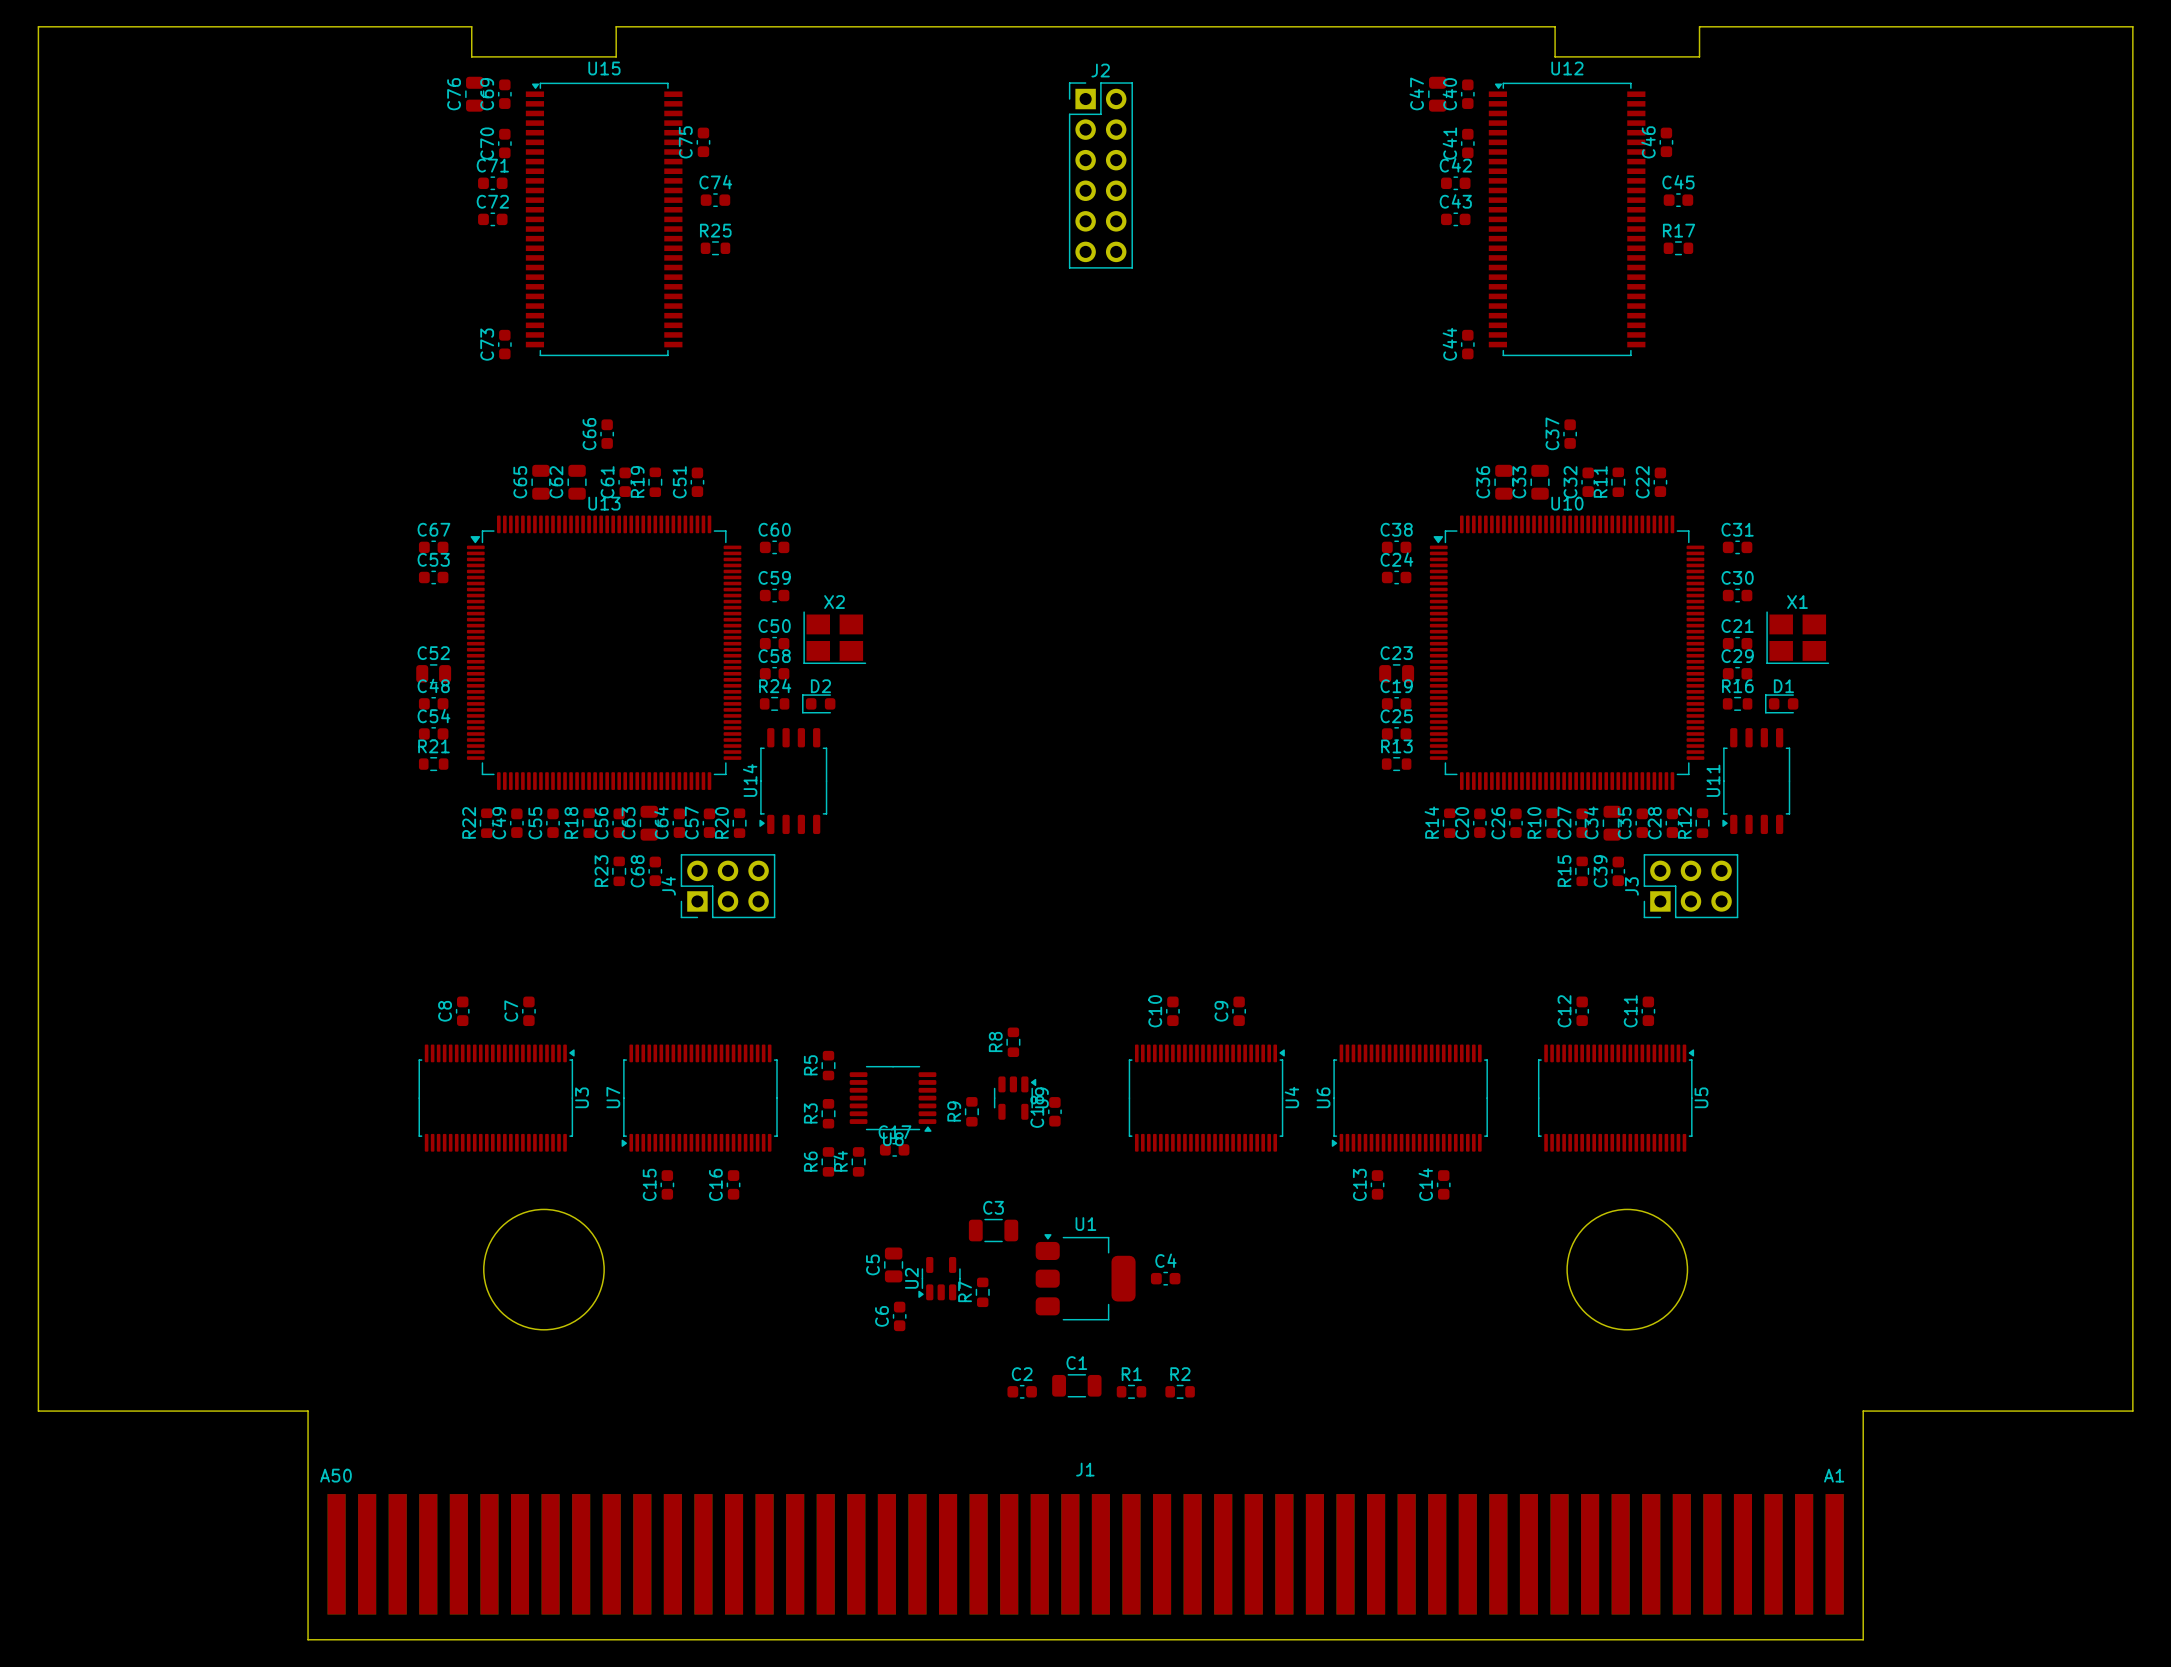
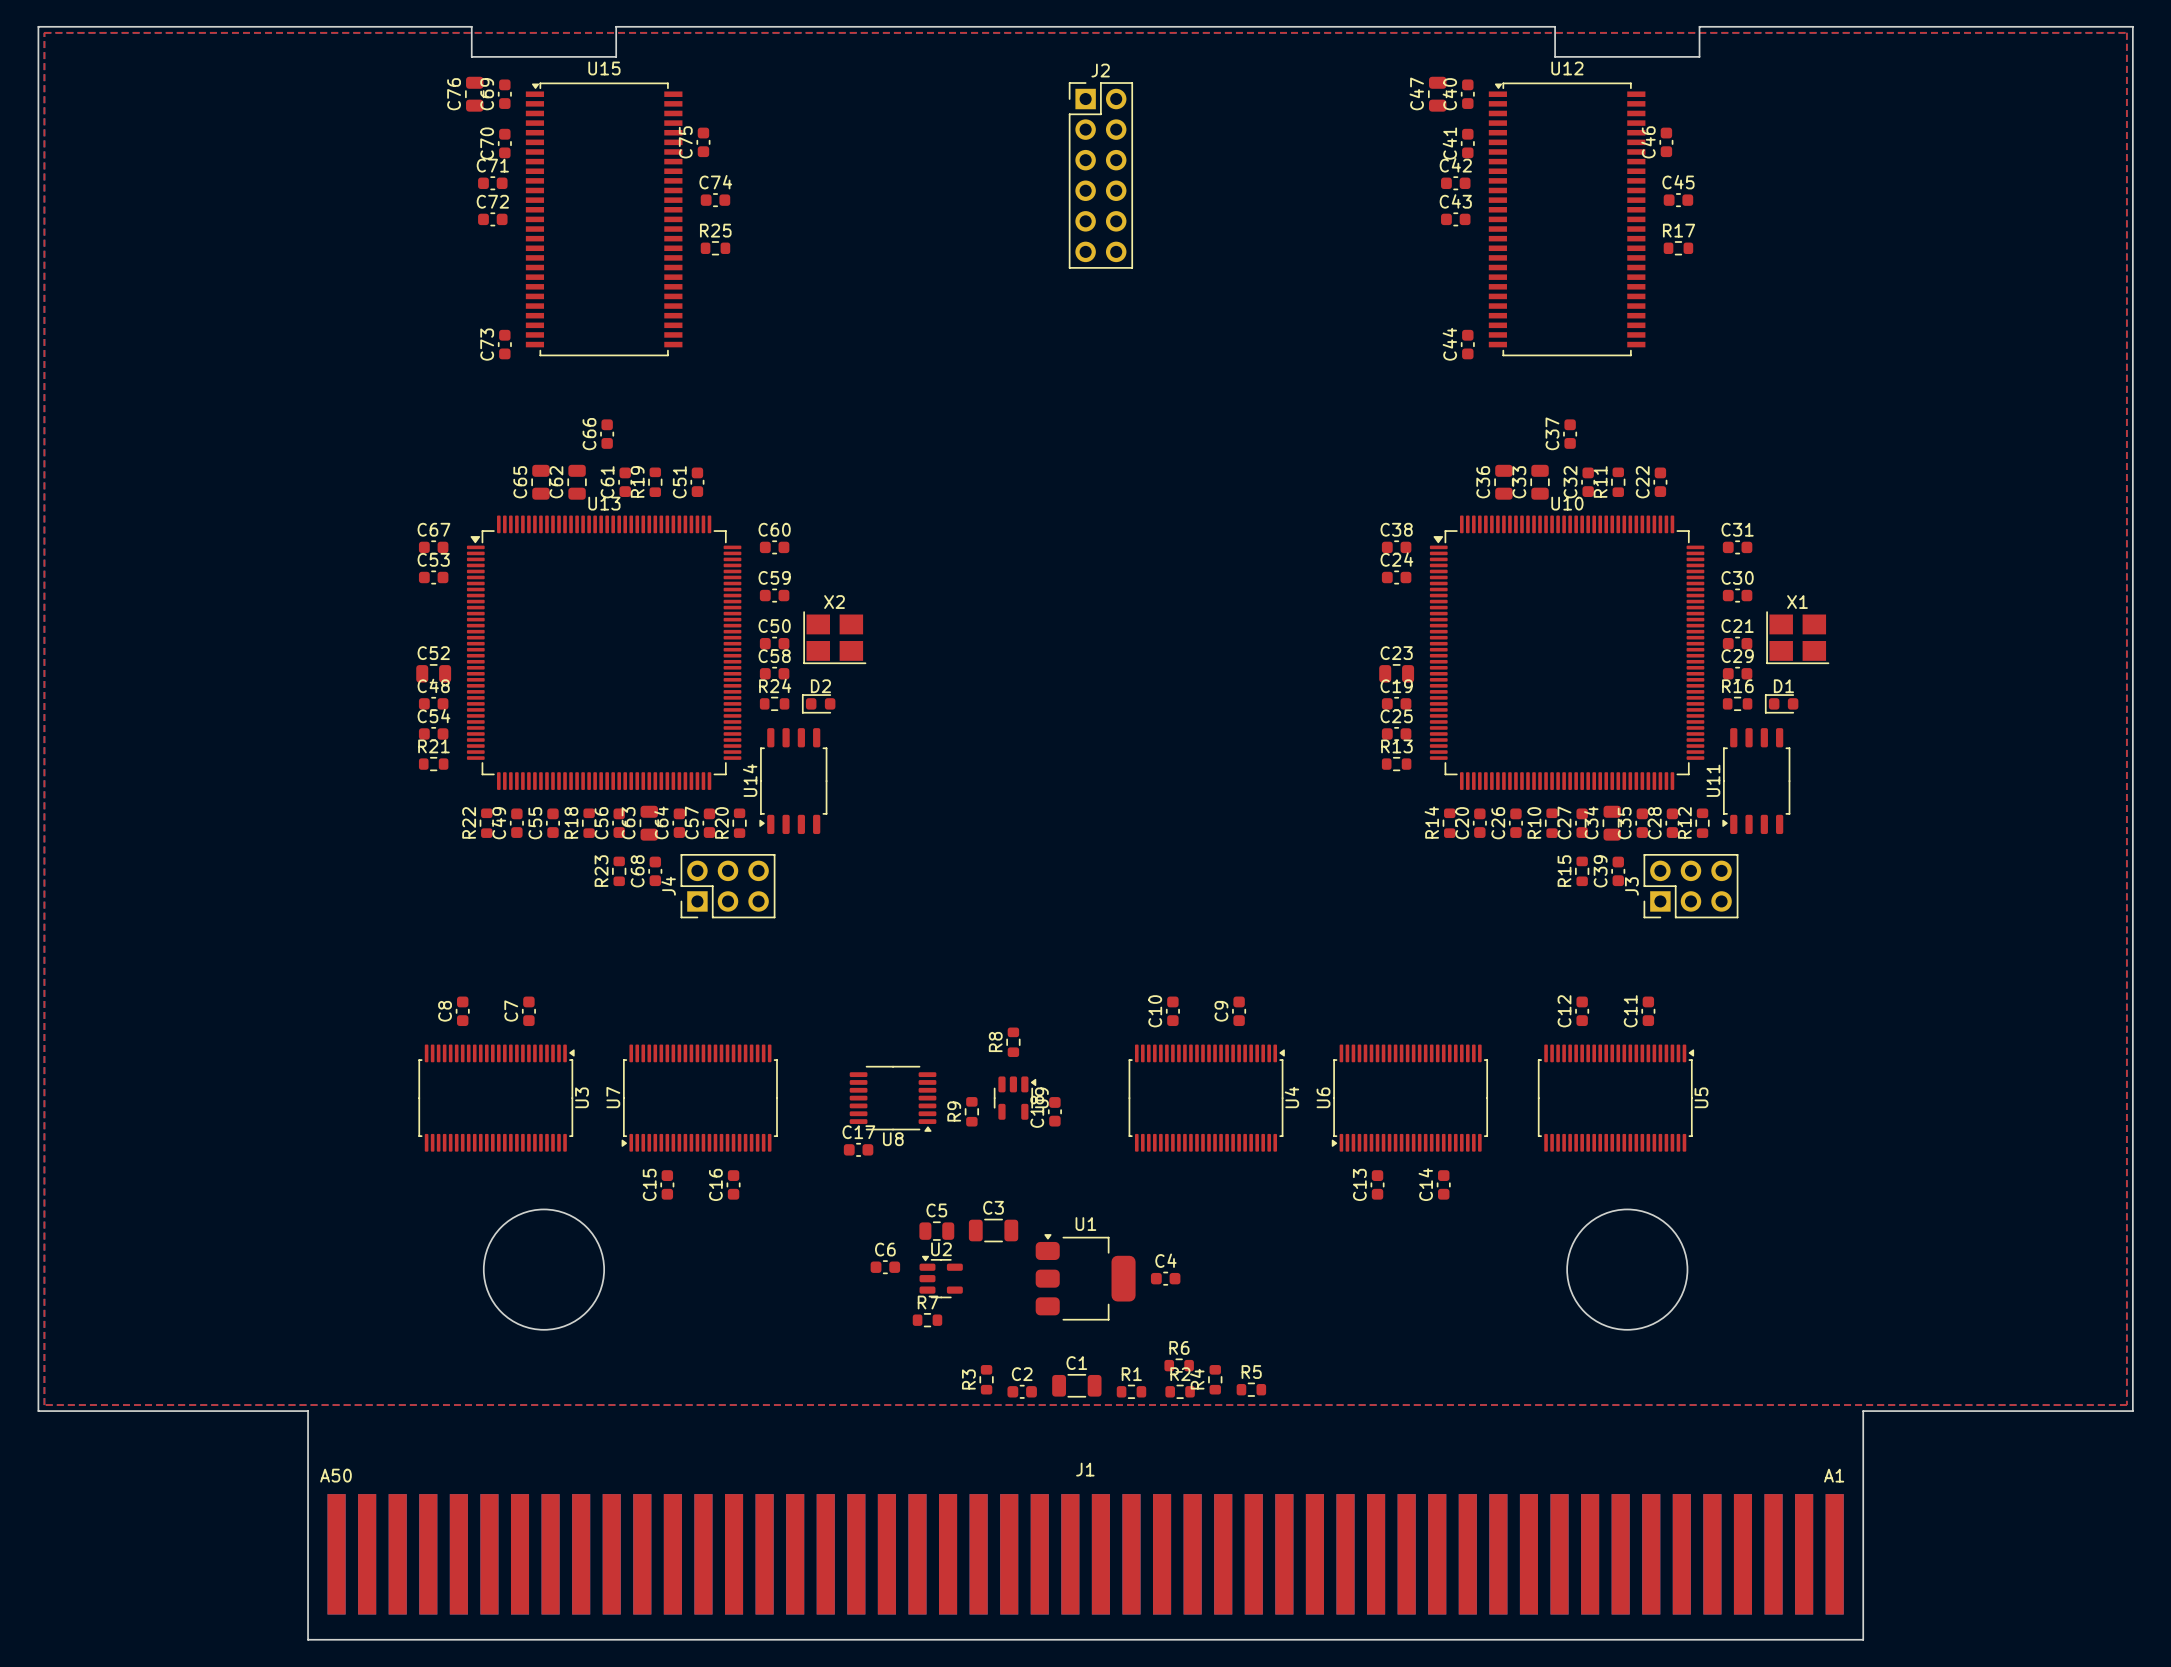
top zone outline: none -> (44, 32) (2126, 32) (2126, 1405) (44, 1405) (44, 32)
R5 rotation: 0° (828, 1065) -> 90° clockwise (1251, 1389)
R5 position: (828, 1065) -> (1251, 1389)
R3 position: (828, 1113) -> (986, 1379)
C17 position: (894, 1149) -> (858, 1149)
R6 rotation: 0° (828, 1161) -> 90° clockwise (1179, 1365)
R6 position: (828, 1161) -> (1179, 1365)
R4 position: (858, 1161) -> (1215, 1379)
C5 rotation: 0° (893, 1264) -> 90° clockwise (936, 1231)
C5 position: (893, 1264) -> (936, 1231)
U2 rotation: 0° (939, 1278) -> 90° clockwise (941, 1276)
R7 rotation: 0° (982, 1292) -> 90° clockwise (927, 1320)
R7 position: (982, 1292) -> (927, 1320)
C6 rotation: 0° (899, 1316) -> 90° clockwise (885, 1267)
C6 position: (899, 1316) -> (885, 1267)

